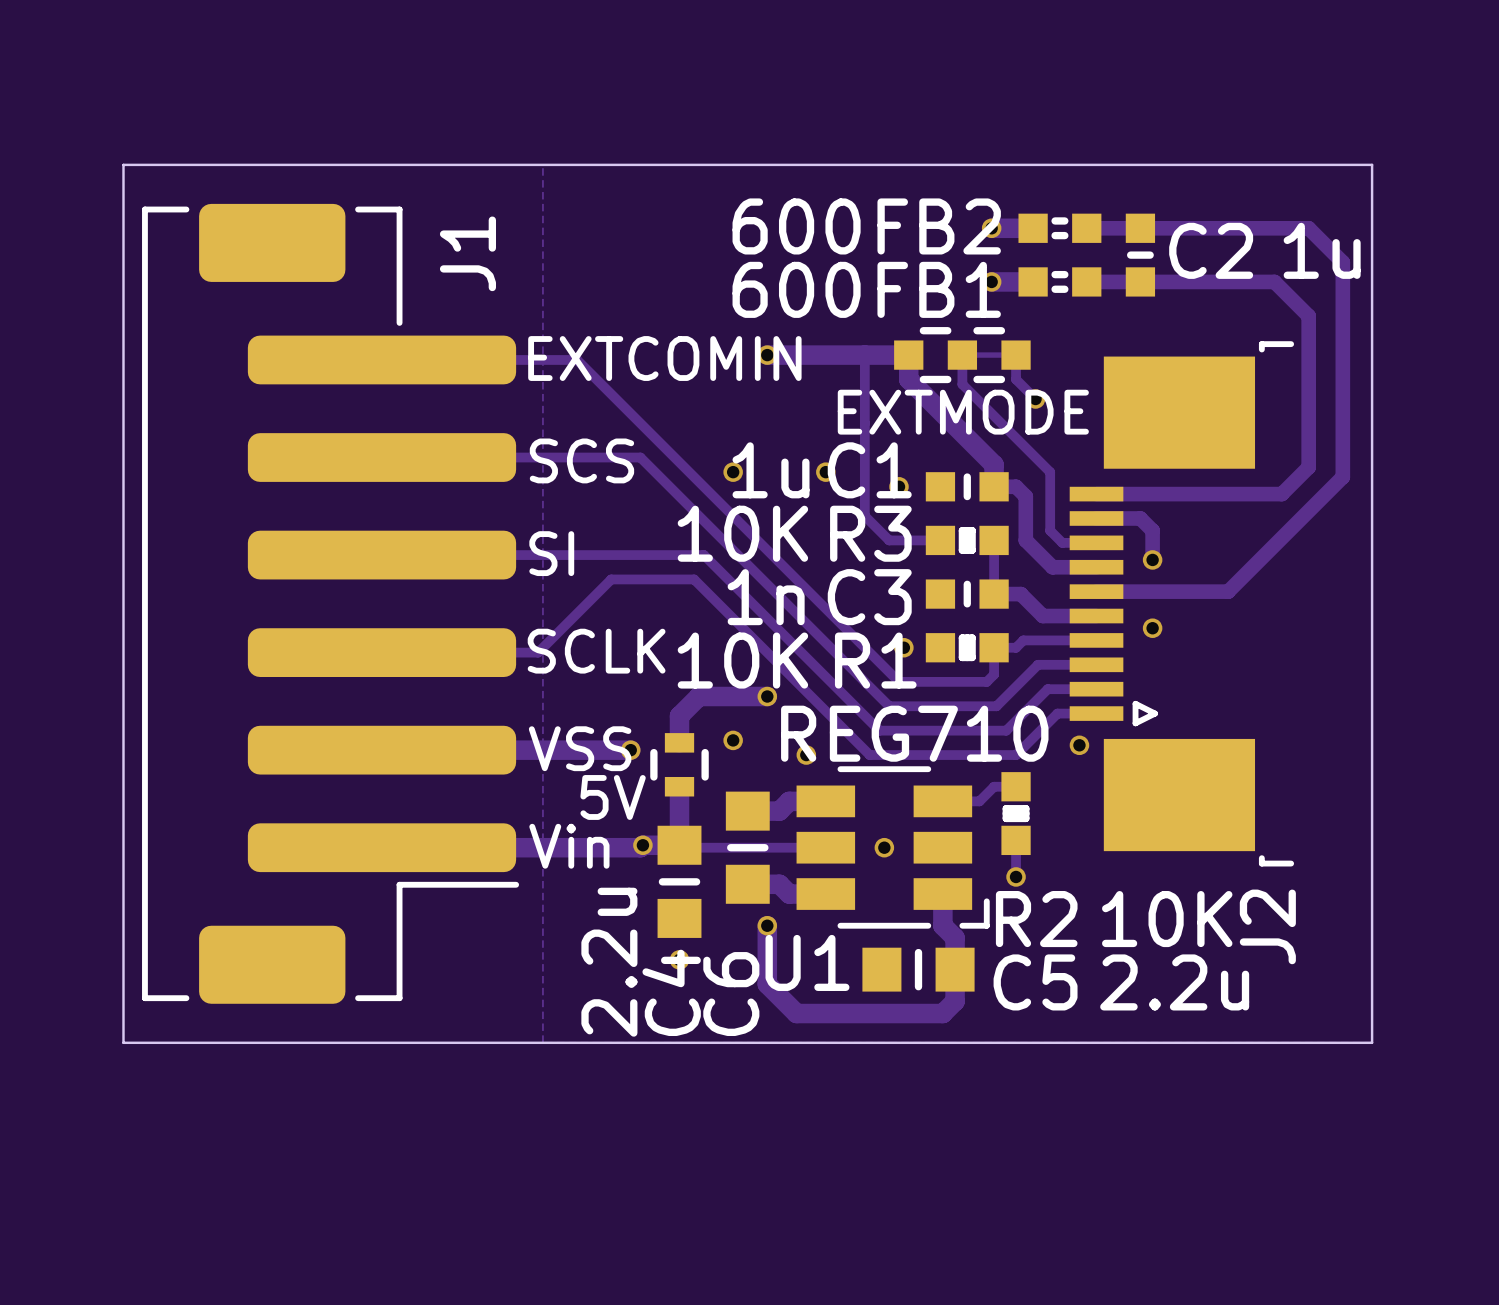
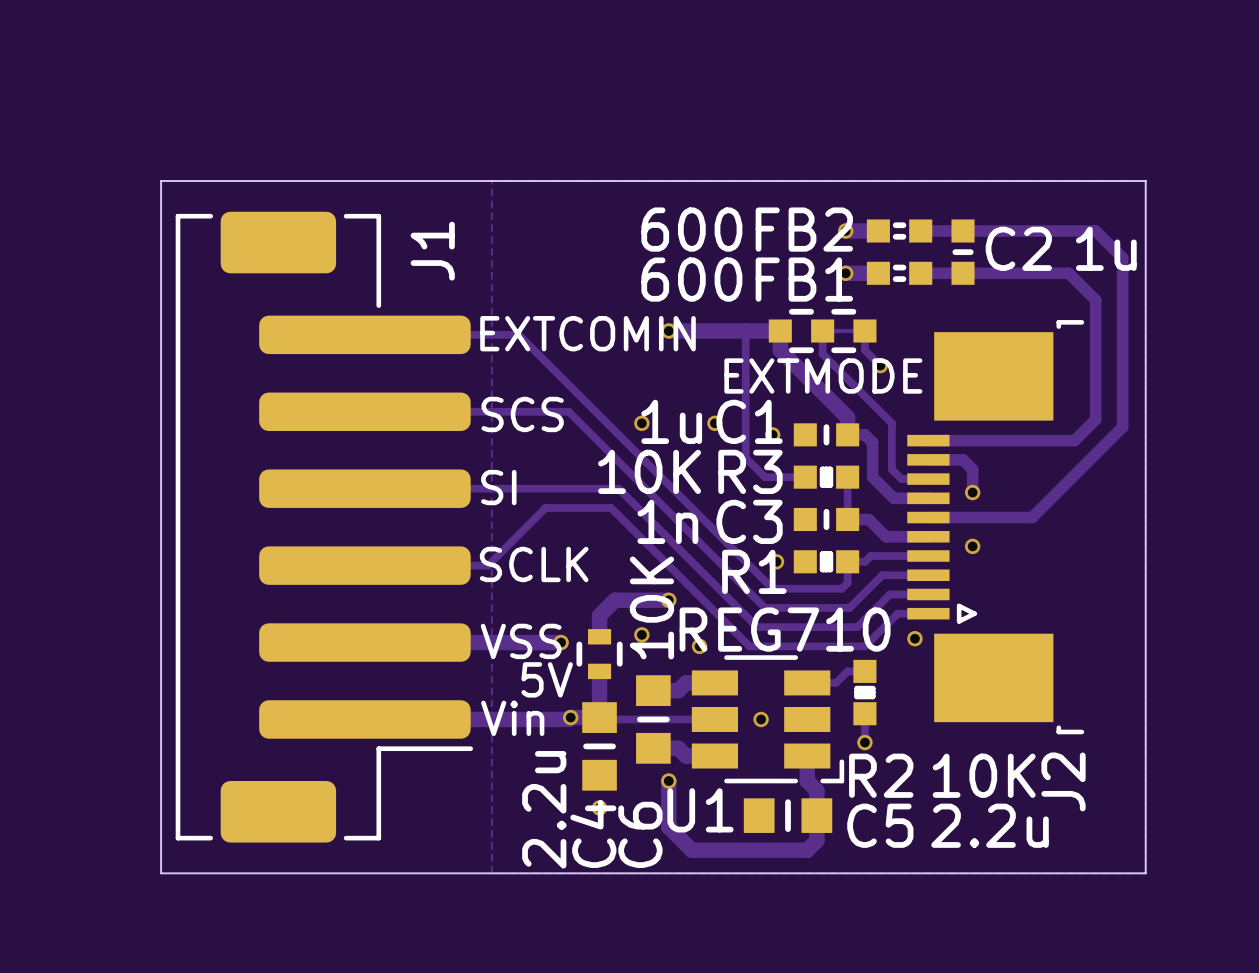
R1 value rotation: 0° (742, 660) -> 90° counterclockwise (651, 607)

